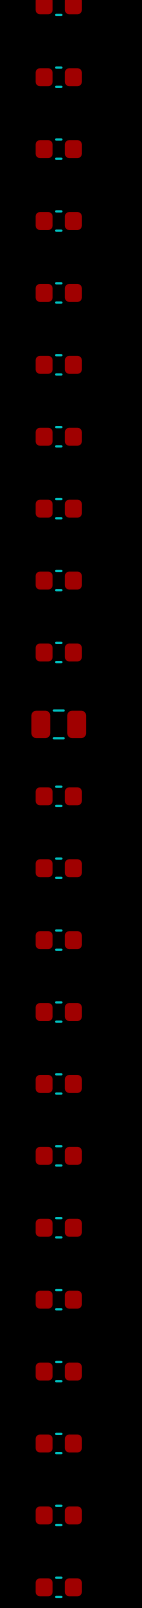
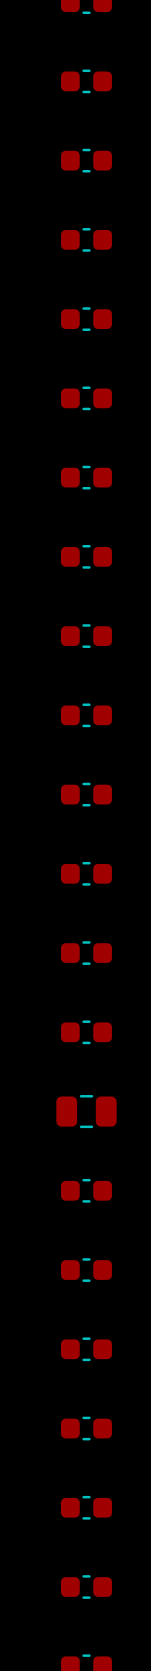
part footprint: [31, 709, 87, 740] -> [61, 782, 112, 807]
part footprint: [35, 1001, 82, 1023] -> [56, 1095, 117, 1129]

